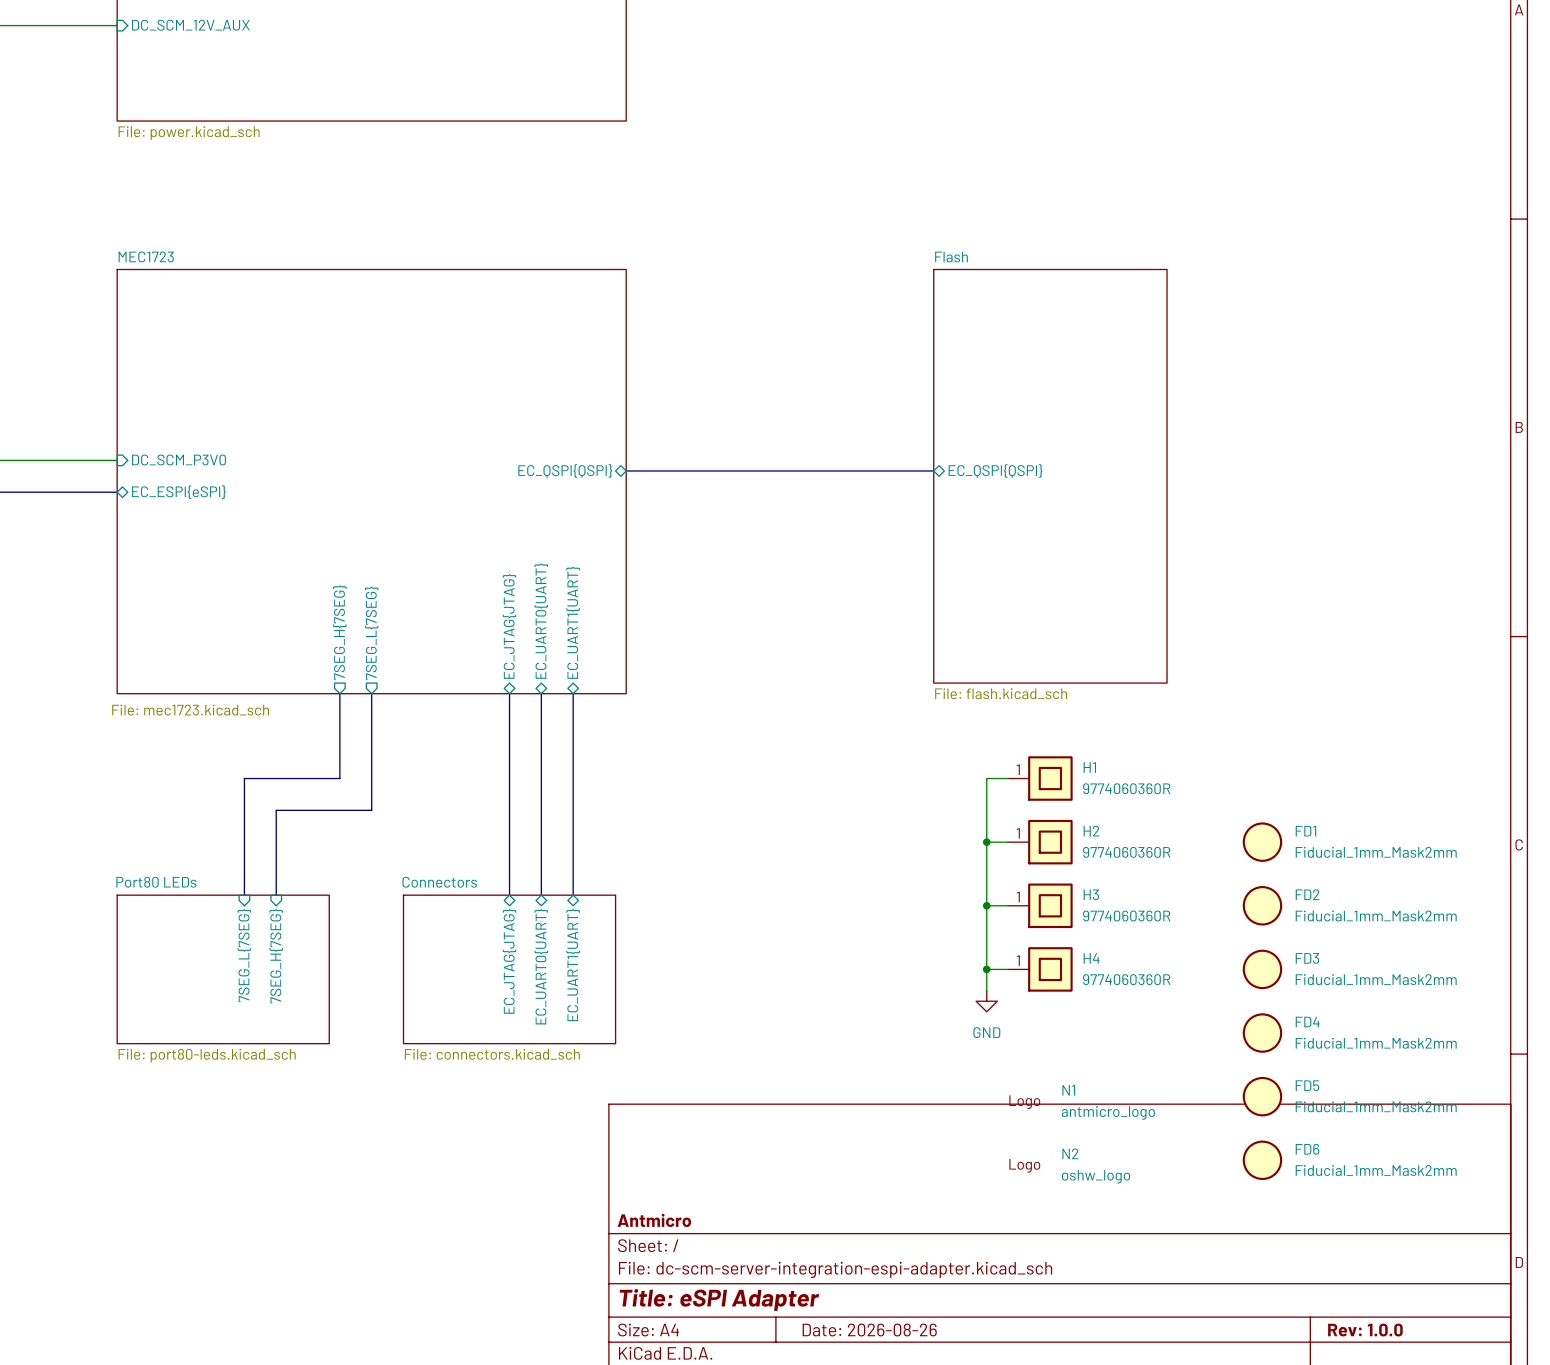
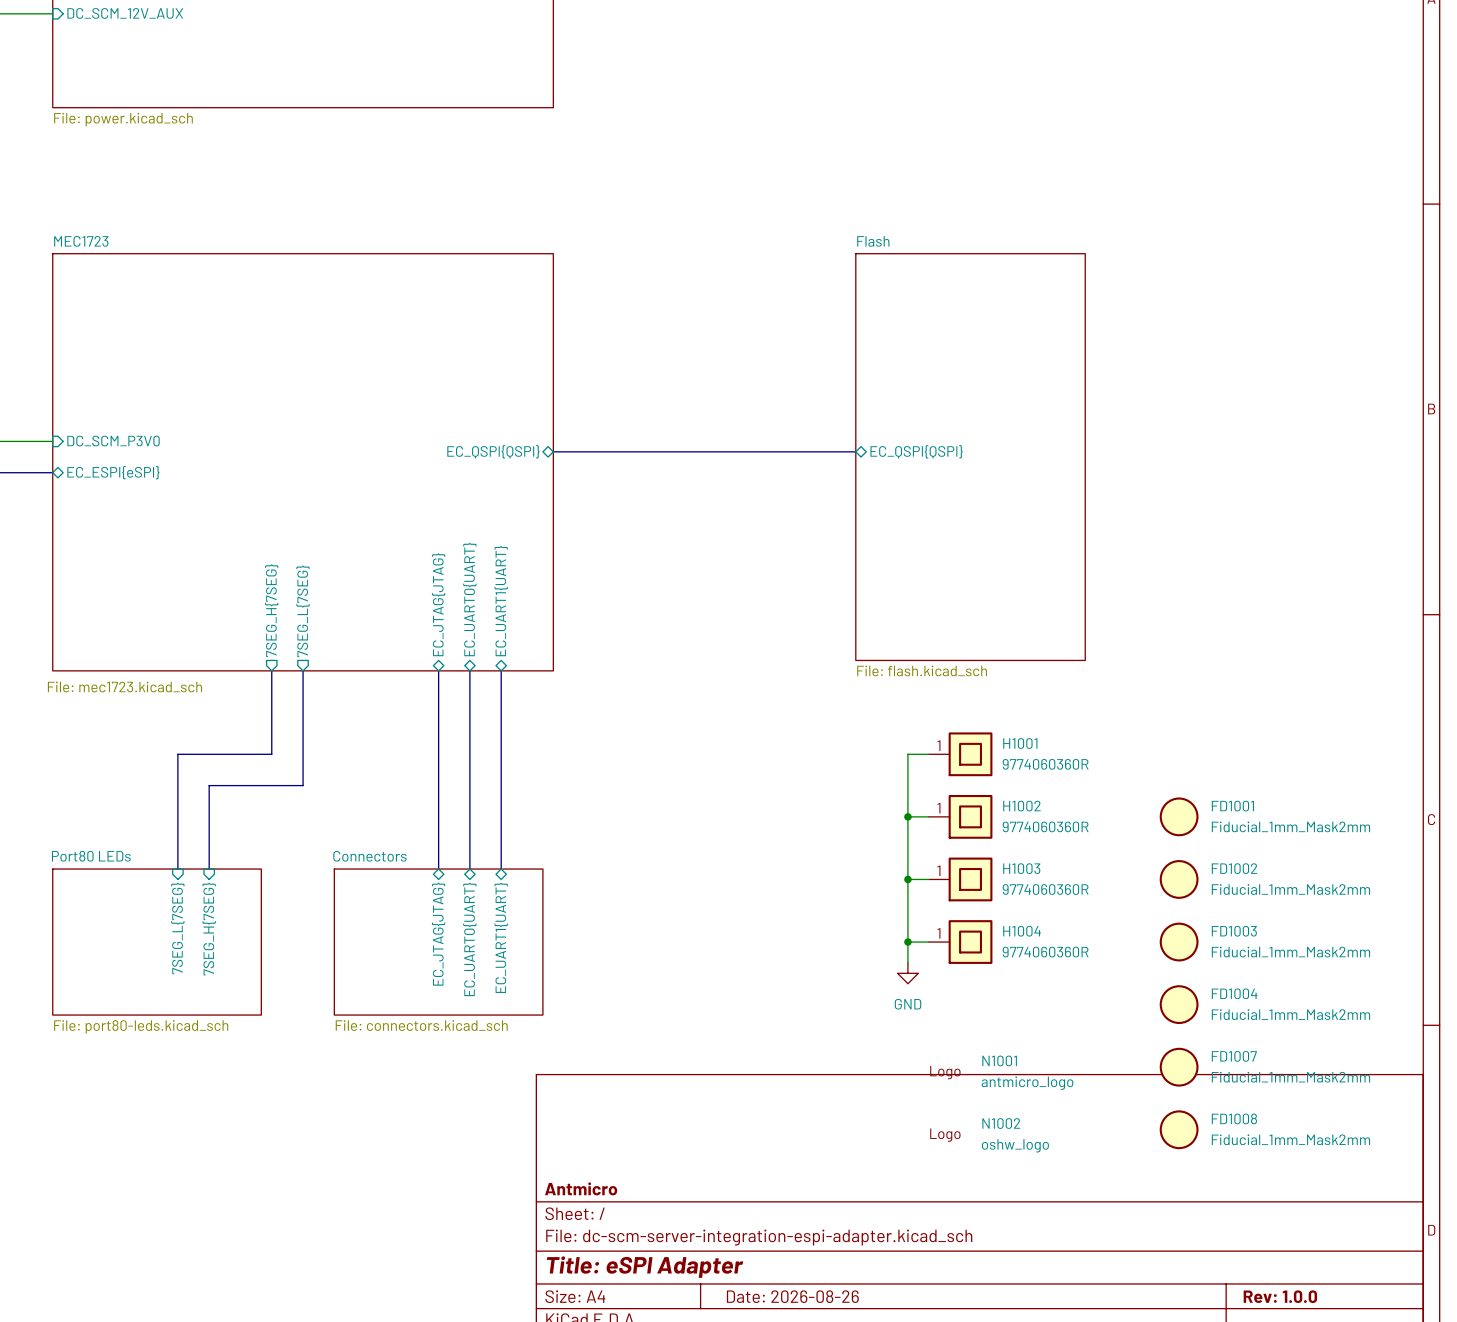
H1 name: H1 (1089, 767) -> H1001 (1020, 743)
H2 name: H2 (1091, 831) -> H1002 (1021, 806)
FD1 name: FD1 (1305, 831) -> FD1001 (1232, 806)
H3 name: H3 (1091, 894) -> H1003 (1021, 868)
FD2 name: FD2 (1307, 894) -> FD1002 (1234, 868)
H4 name: H4 (1091, 958) -> H1004 (1022, 931)
FD3 name: FD3 (1307, 958) -> FD1003 (1234, 931)
FD4 name: FD4 (1307, 1022) -> FD1004 (1234, 993)
FD5 name: FD5 (1307, 1085) -> FD1007 (1234, 1056)
N1 name: N1 (1068, 1090) -> N1001 (999, 1060)
FD6 name: FD6 (1307, 1149) -> FD1008 (1234, 1118)
N2 name: N2 (1070, 1153) -> N1002 (1001, 1123)

